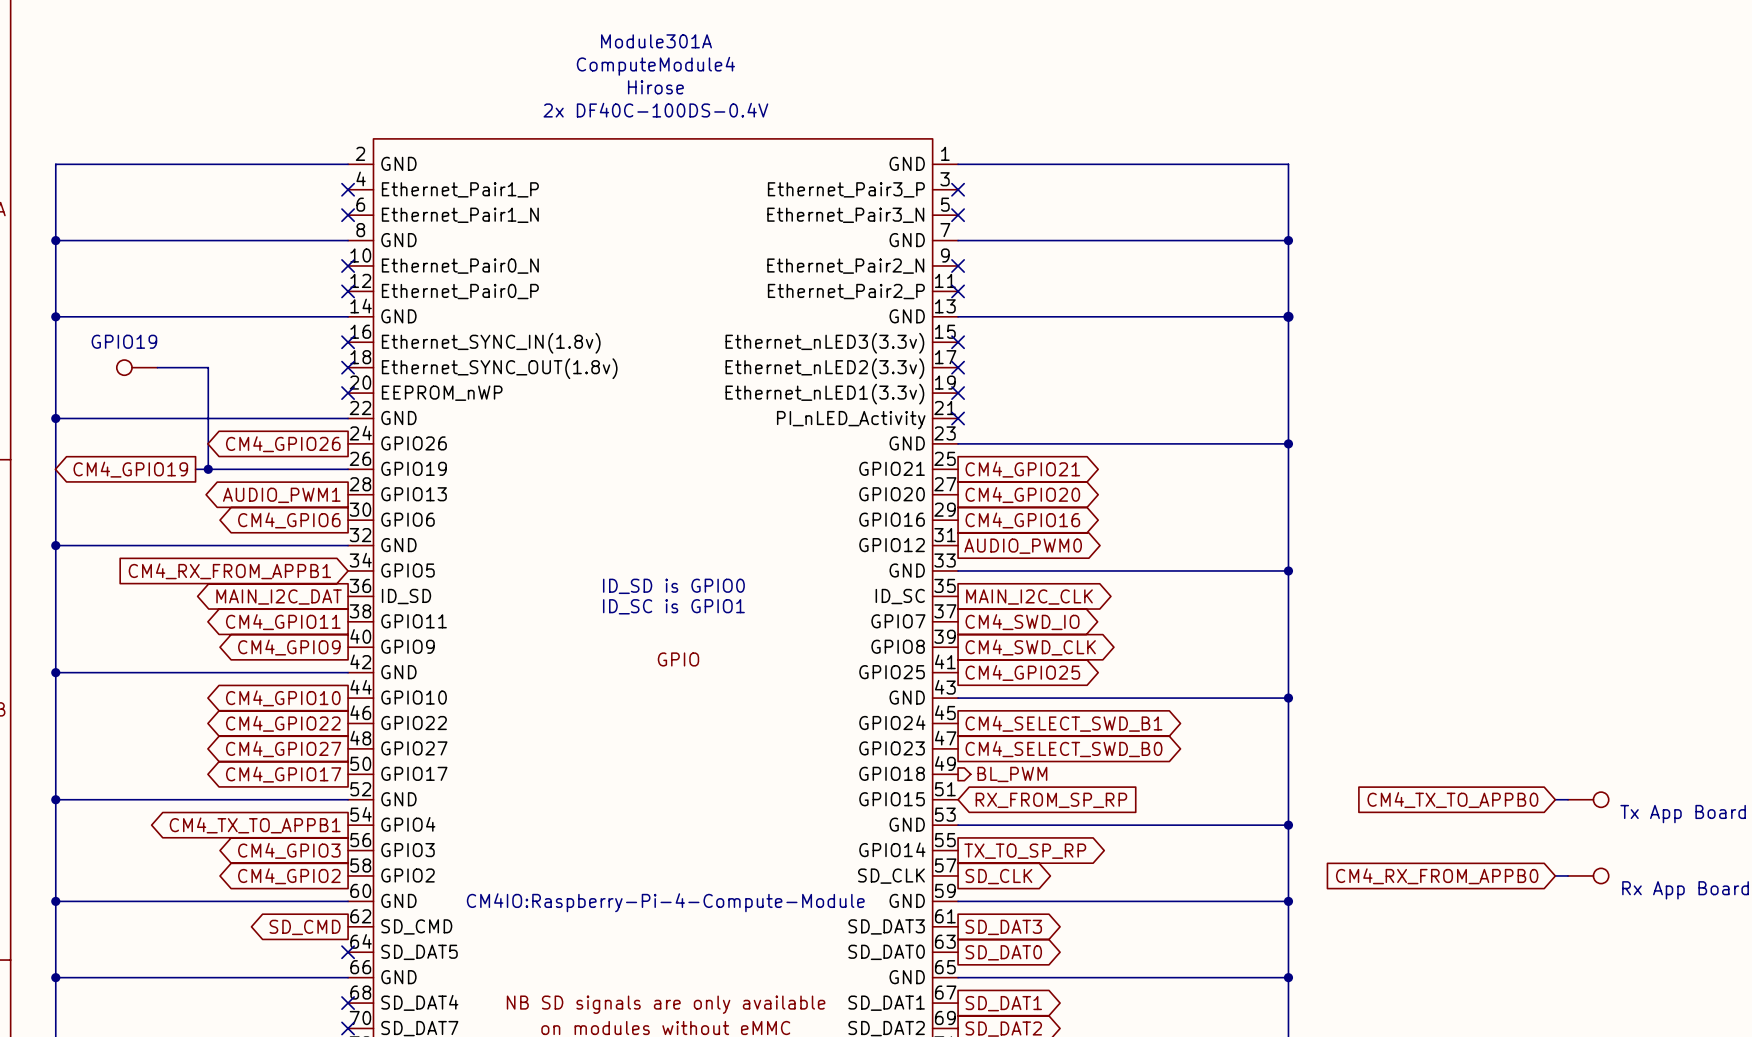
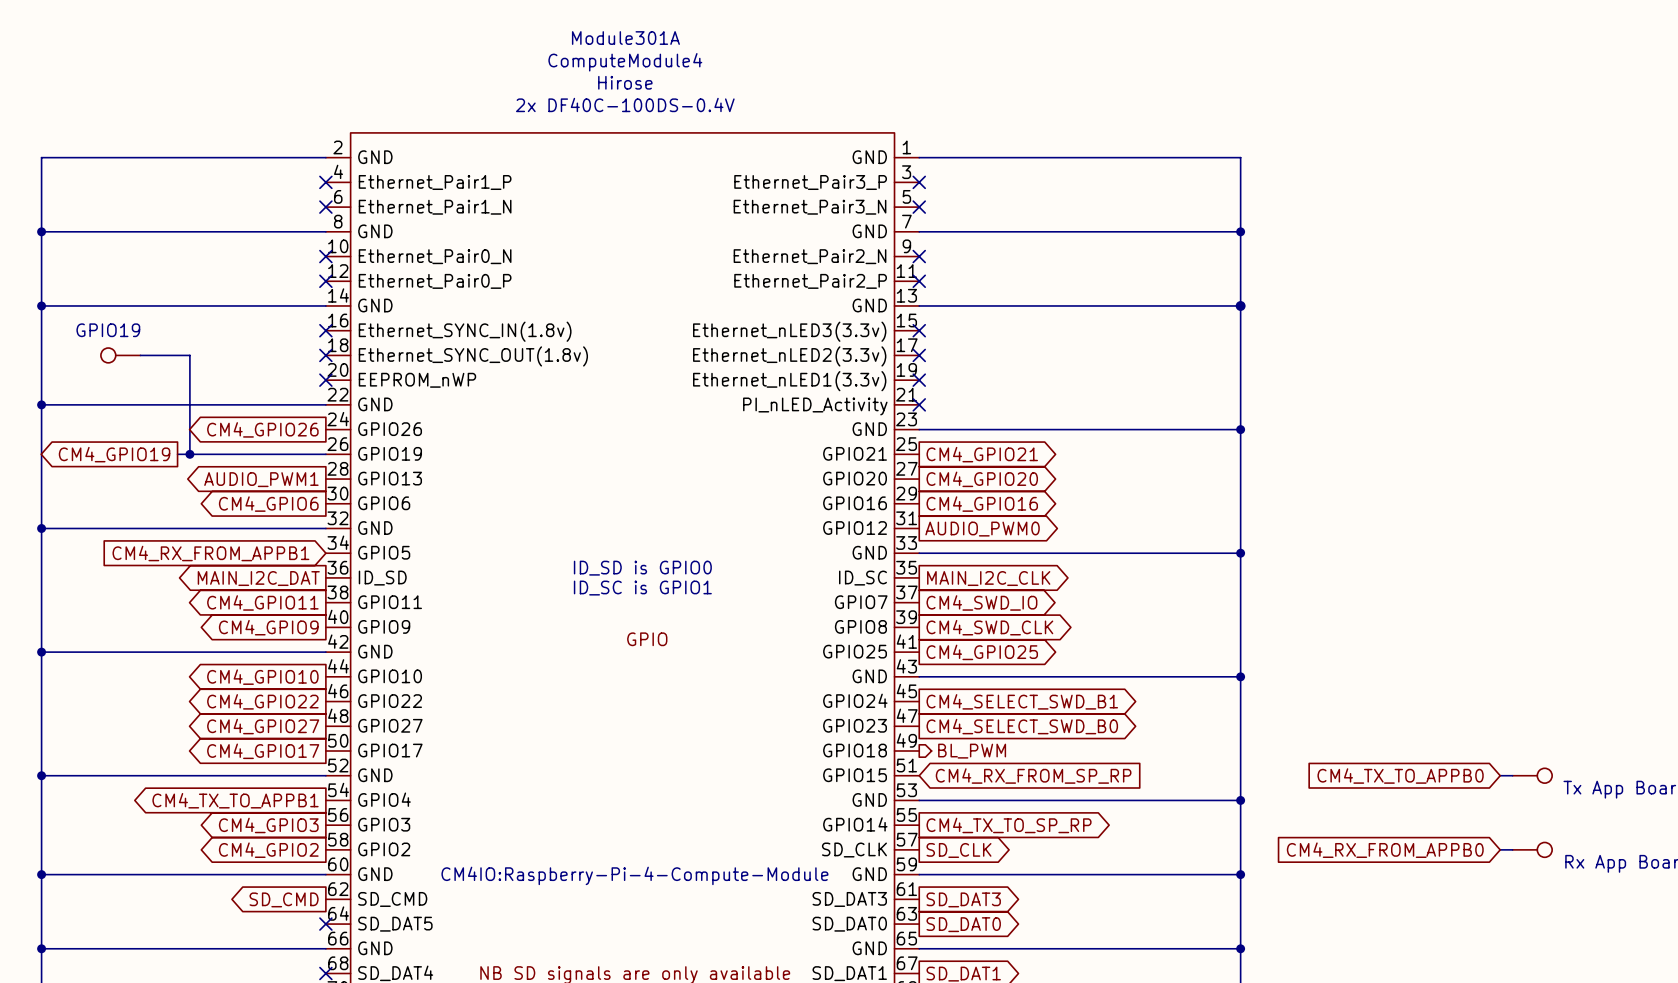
global label: RX_FROM_SP_RP (1051, 800) -> CM4_RX_FROM_SP_RP (1033, 776)
global label: TX_TO_SP_RP (1025, 851) -> CM4_TX_TO_SP_RP (1009, 825)

